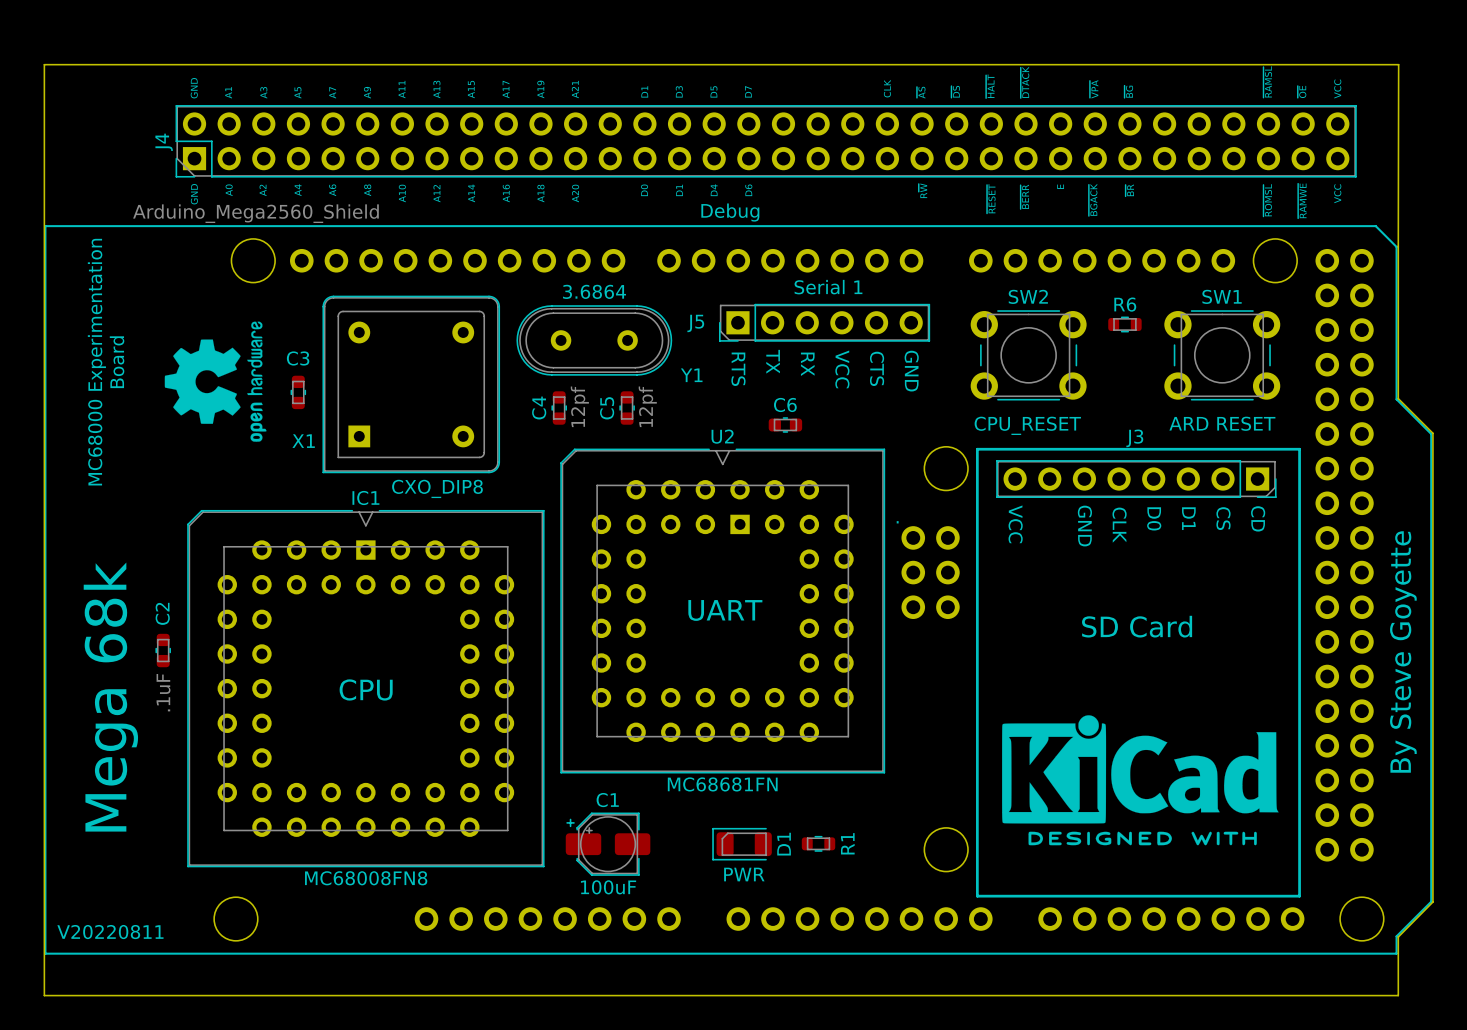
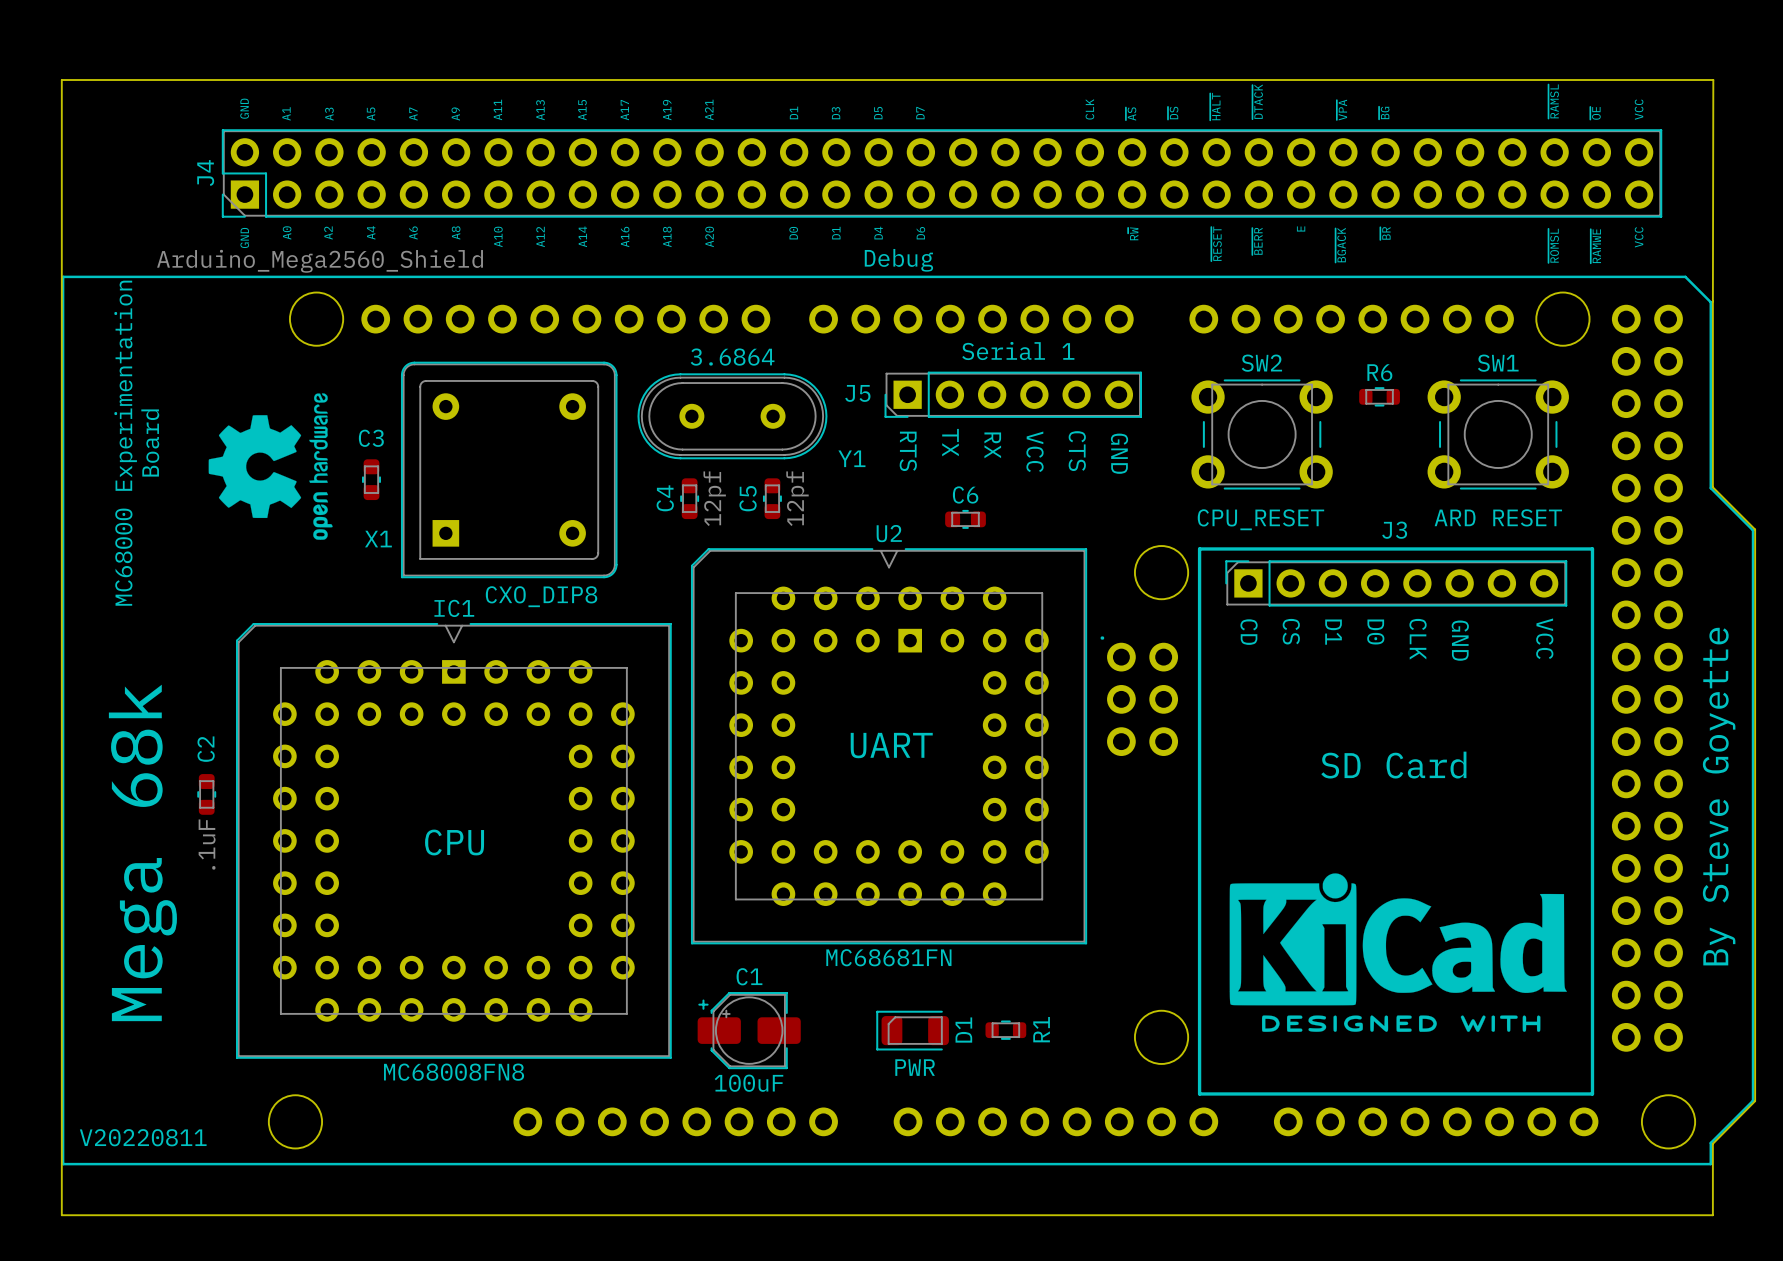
J3 rotation: 0° (1136, 479) -> 180° (1396, 583)
text: D0 (1154, 518) -> CLK (1418, 639)
text: D1 (1188, 518) -> GND (1460, 640)
text position: CS (1223, 518) -> CS (1291, 631)
text: CD (1258, 518) -> VCC (1544, 638)
text: VCC (1015, 524) -> CD (1249, 632)
text: CLK (1119, 525) -> D0 (1375, 632)
text: GND (1084, 526) -> D1 (1333, 632)

